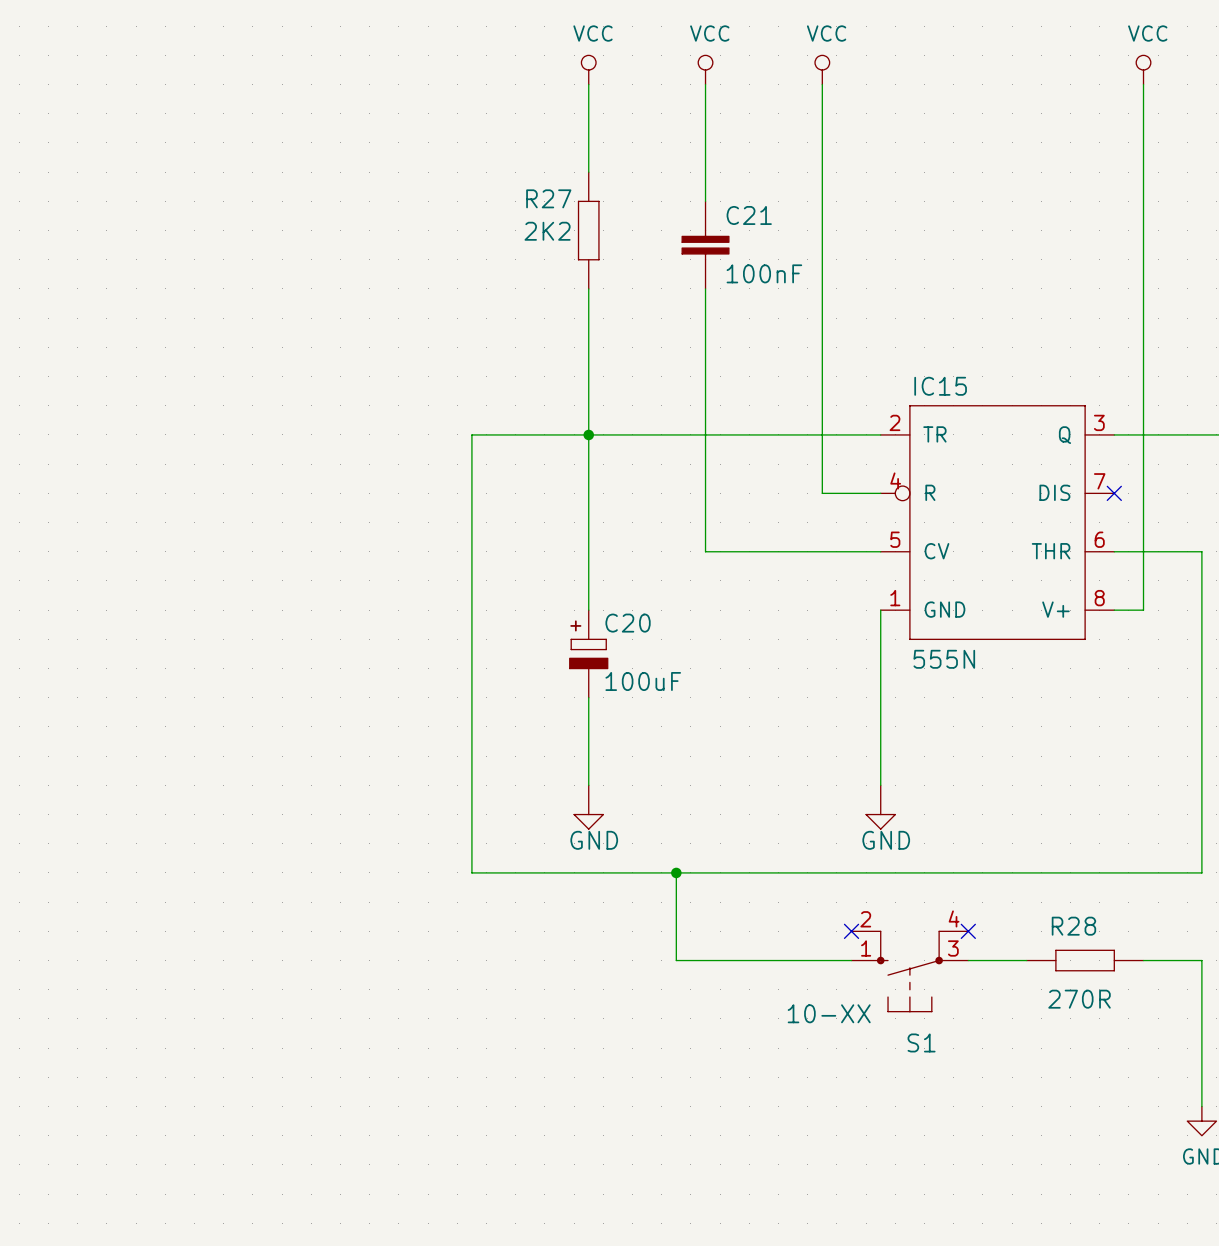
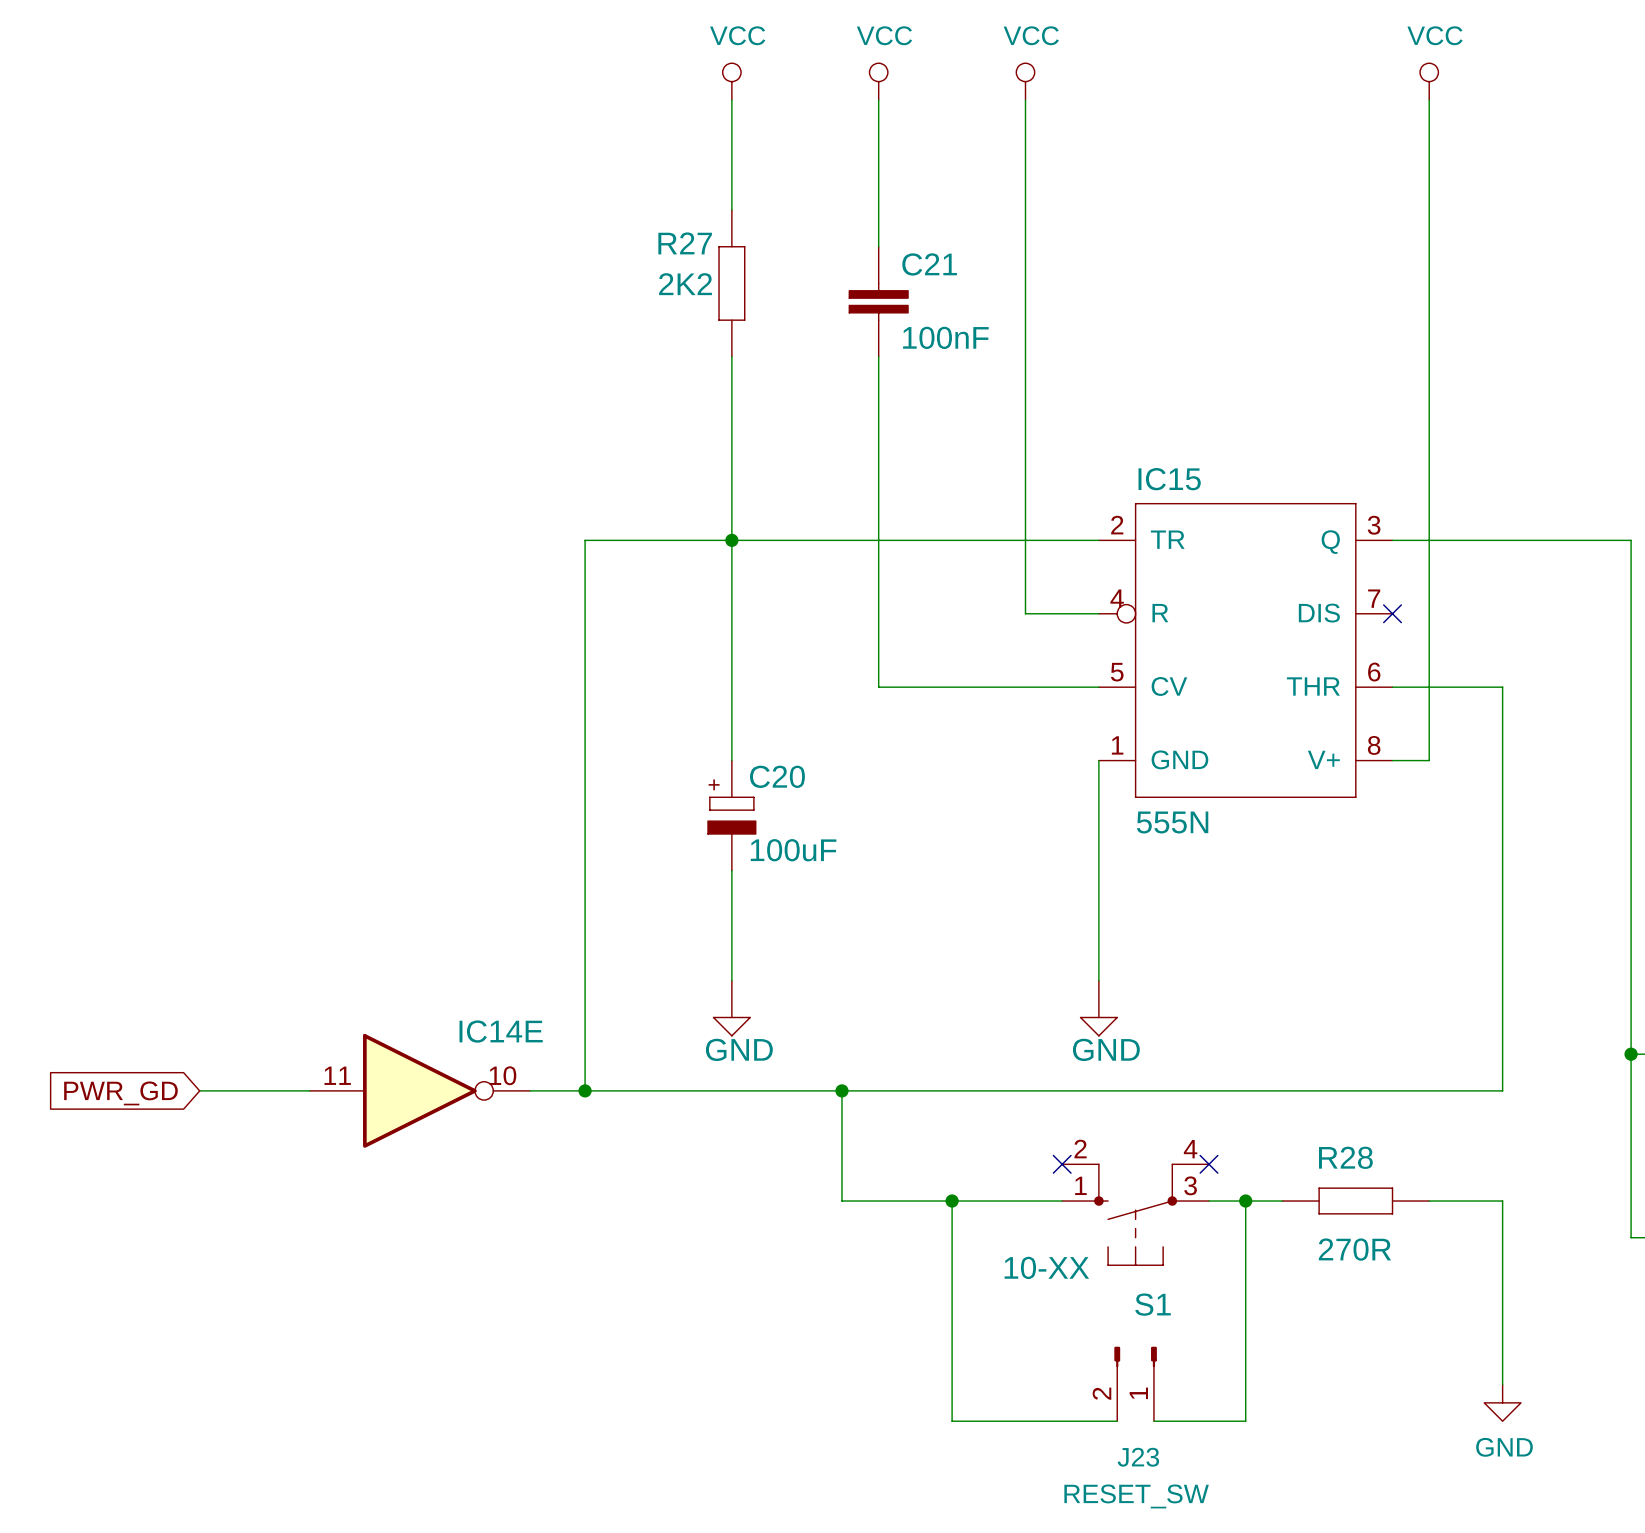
wire: none -> (199, 1090) (309, 1090)
IC14E: none -> (419, 1090)
wire: none -> (530, 1090) (585, 1090)
junction: none -> (585, 1090)
global label: none -> PWR_GD (120, 1093)
wire: none -> (952, 1201) (952, 1421) (1117, 1421)
junction: none -> (952, 1201)
wire: none -> (1245, 1201) (1245, 1421) (1153, 1421)
junction: none -> (1245, 1201)
J23: none -> RESET_SW (1135, 1383)

